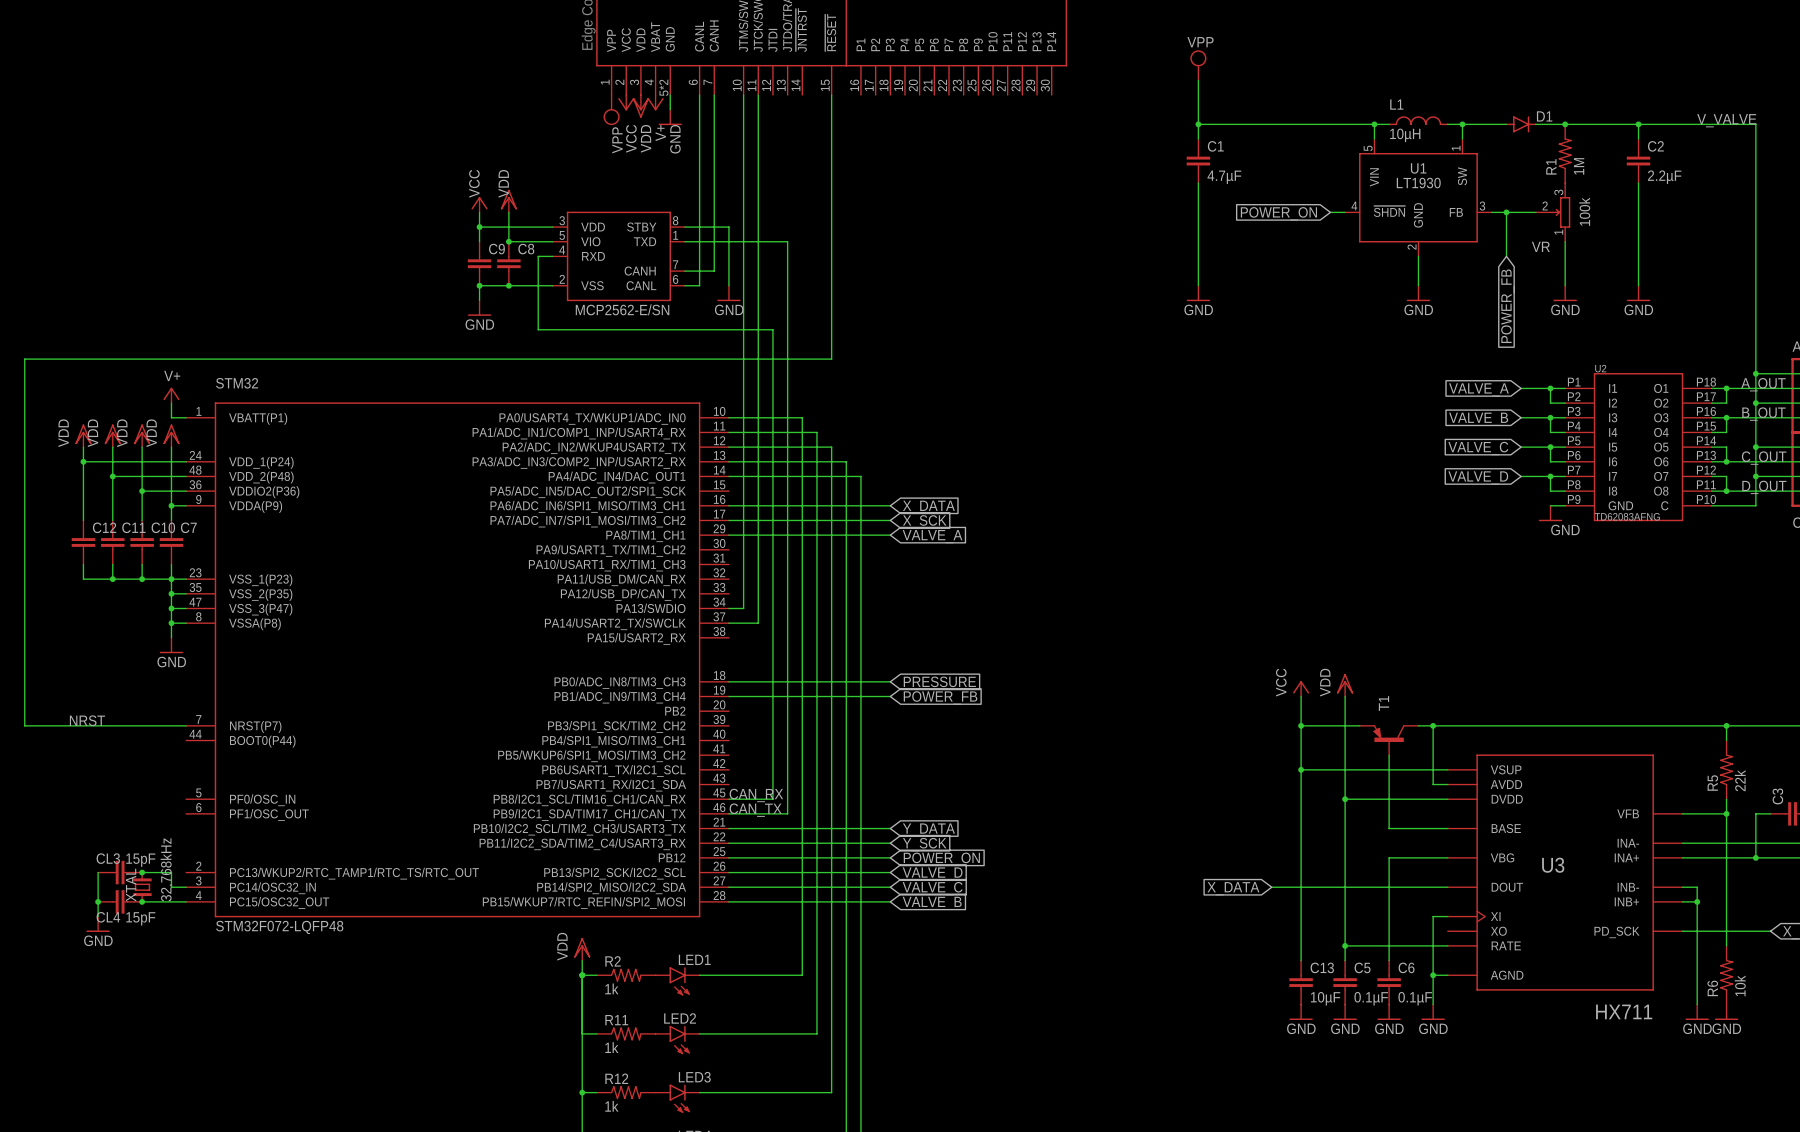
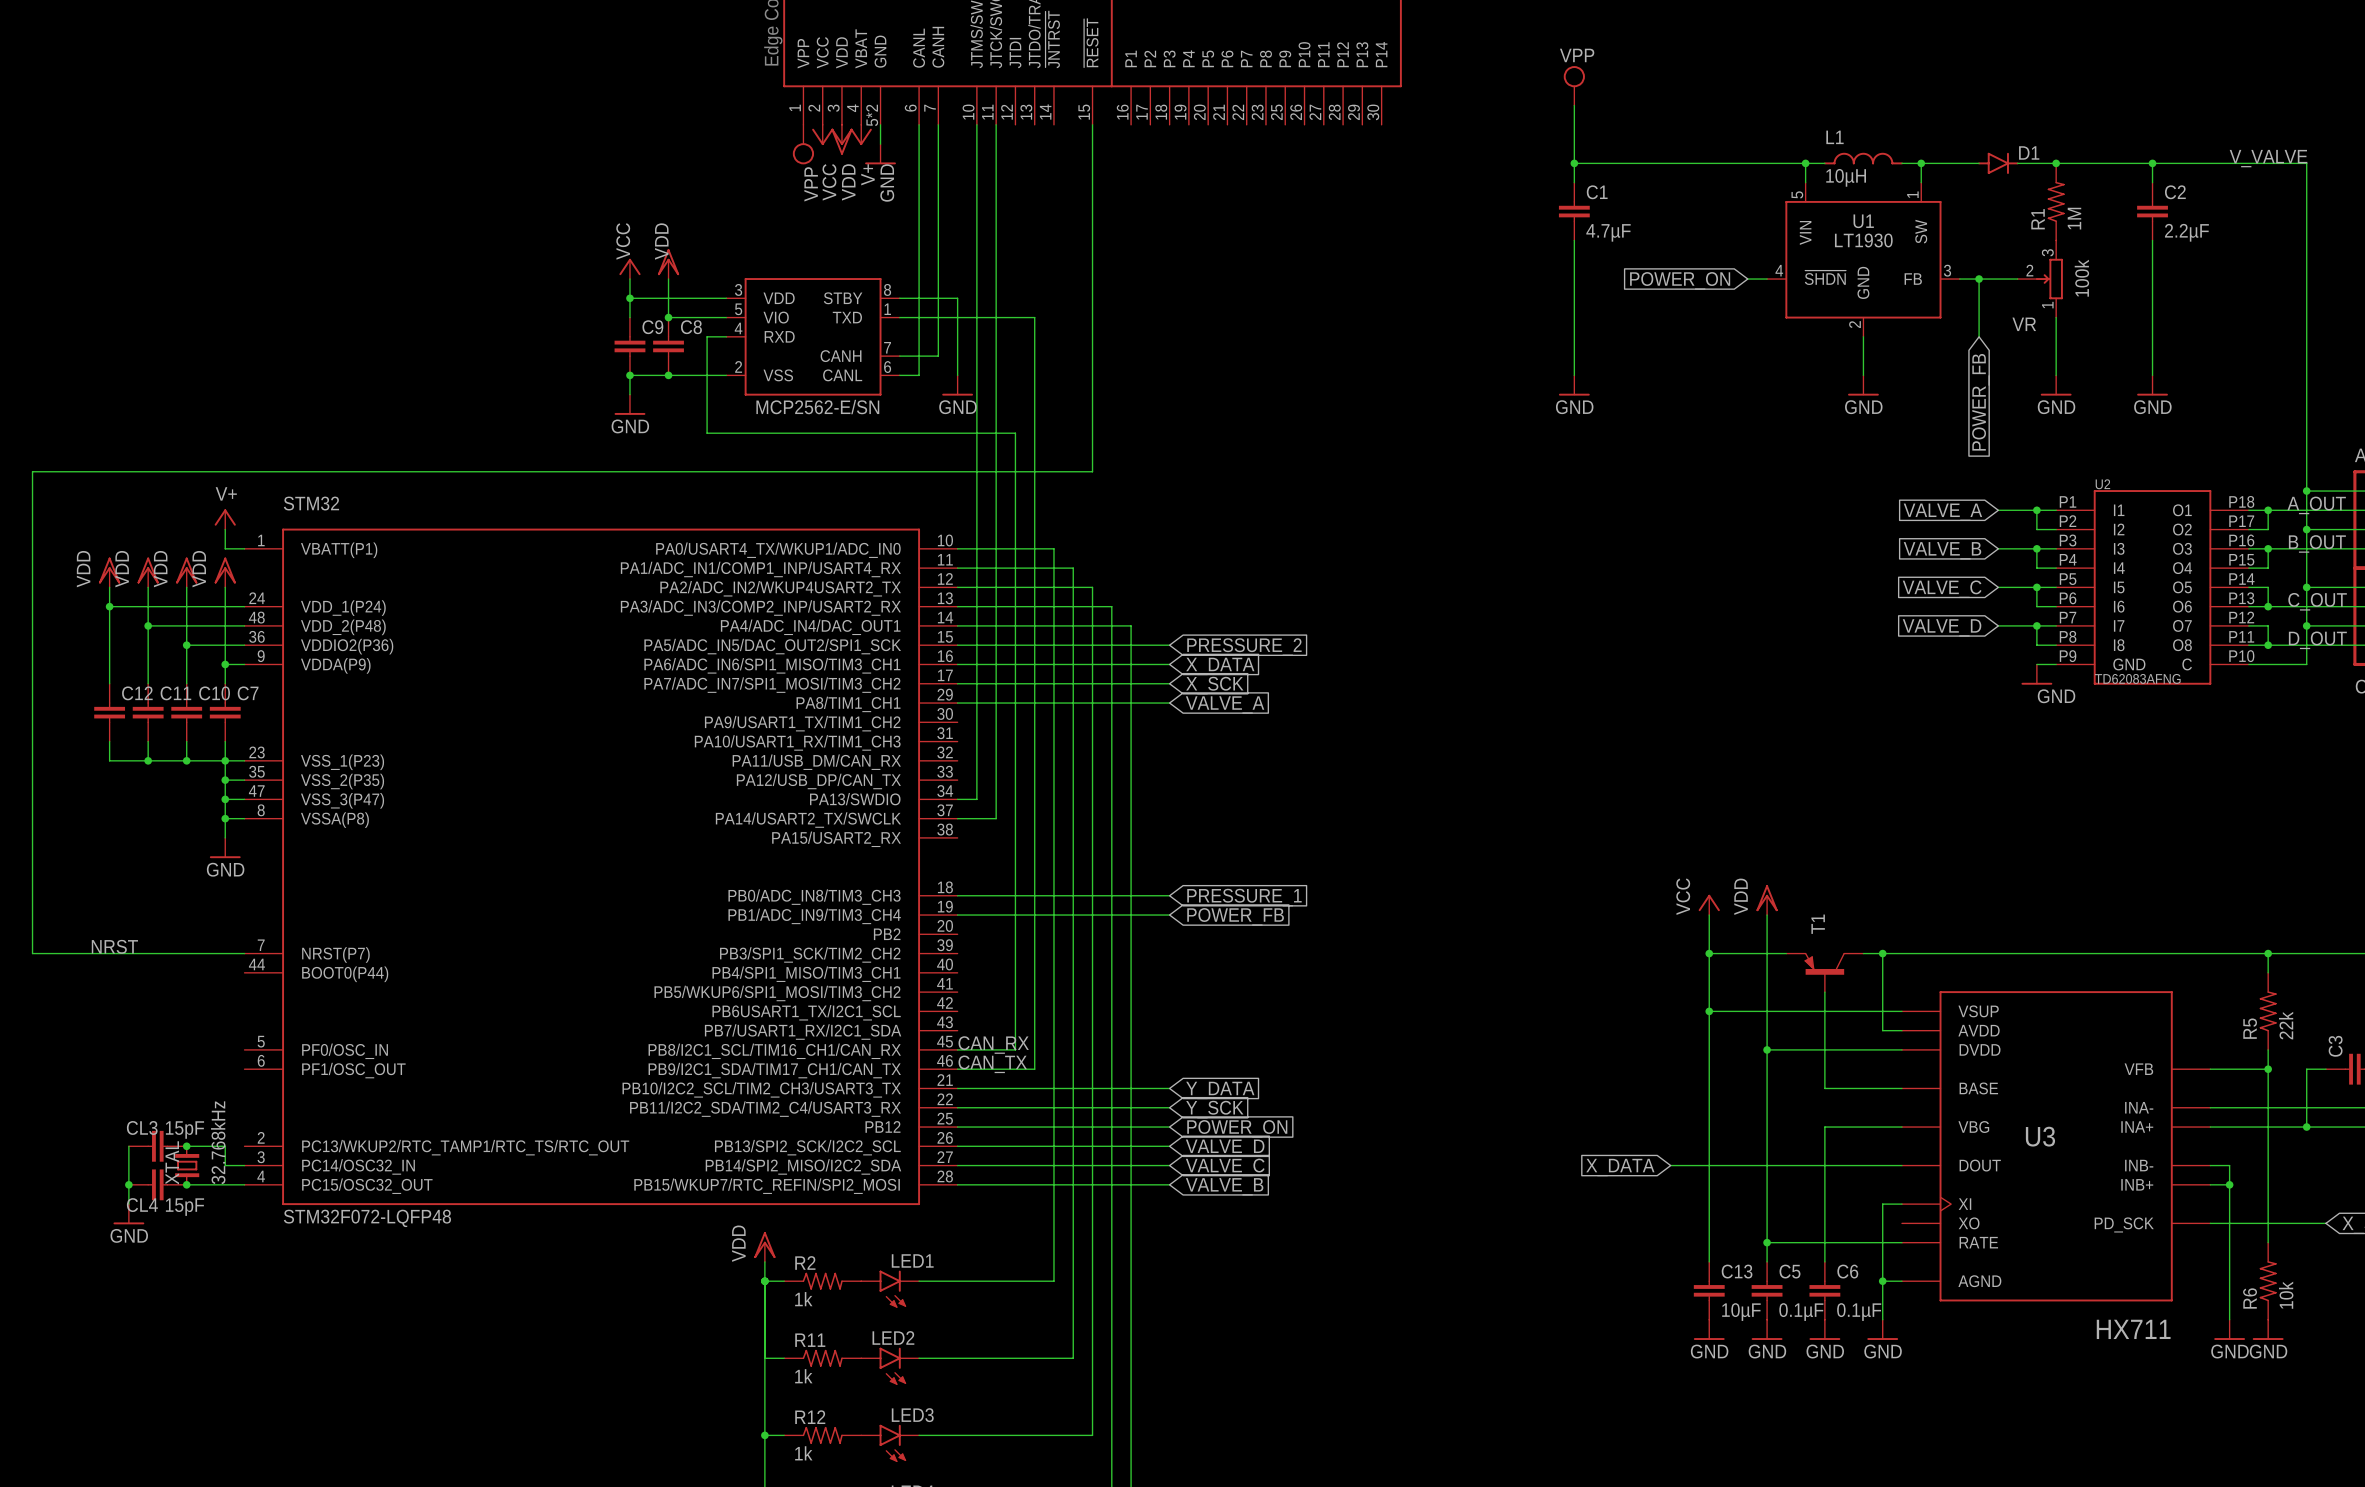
wire: none -> (957, 645) (1169, 645)
global label: none -> PRESSURE_2 (1244, 647)
global label: PRESSURE (939, 681) -> PRESSURE_1 (1244, 897)

